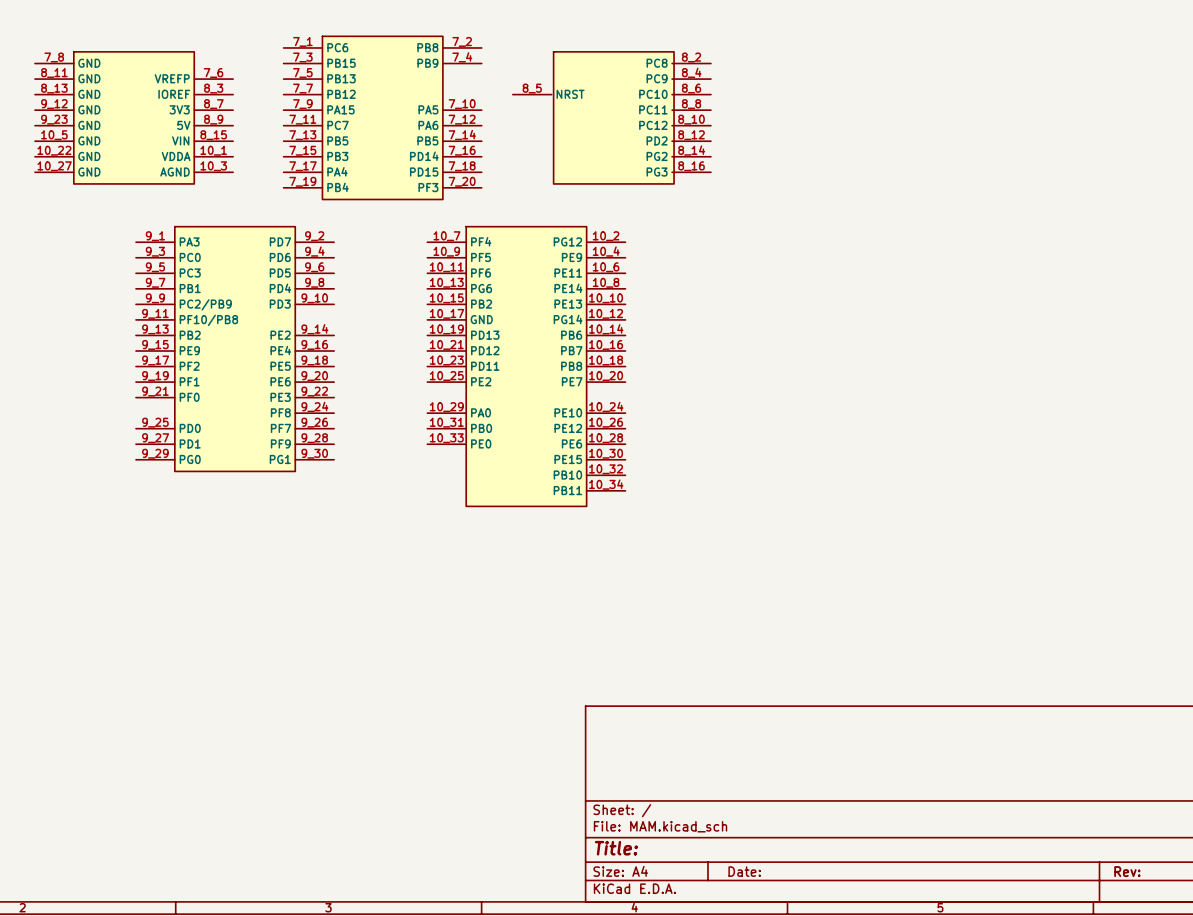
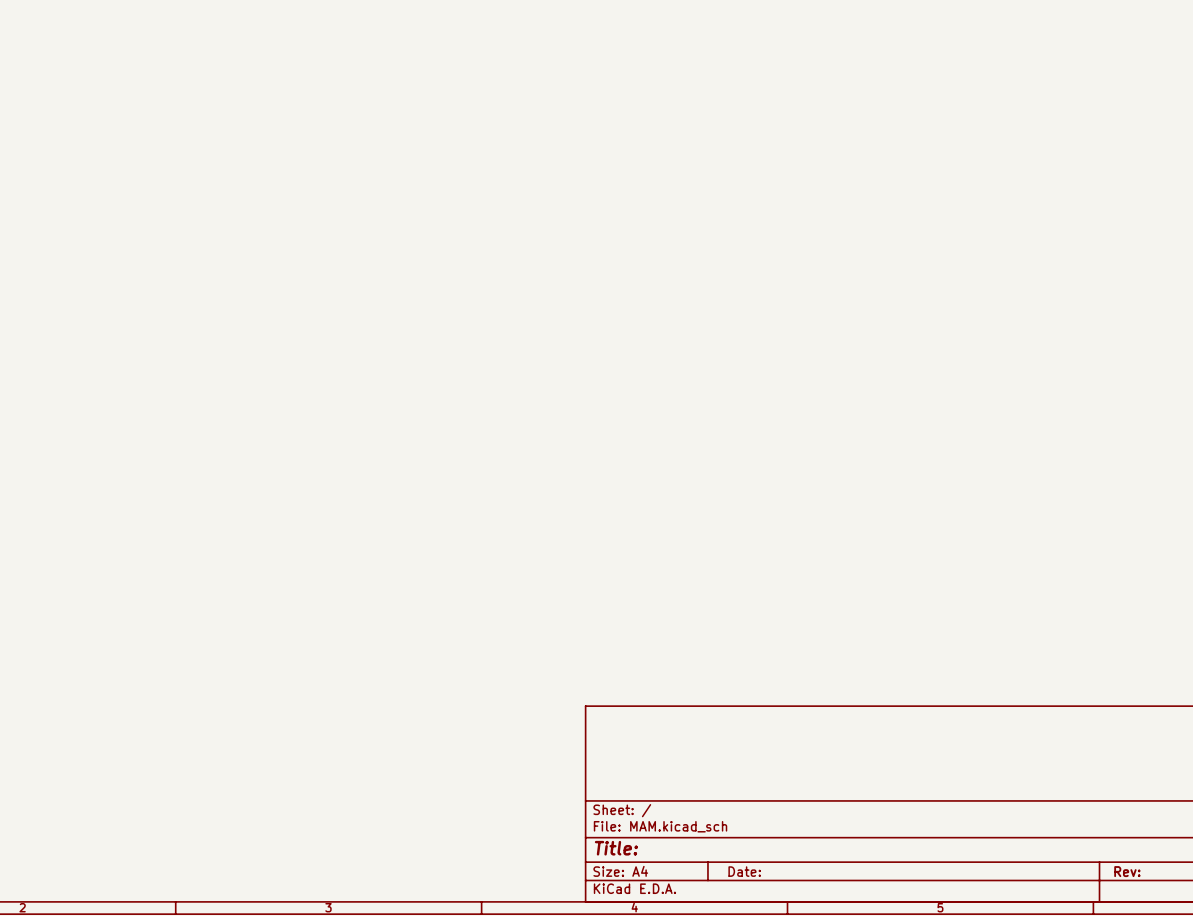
part: (134, 117) -> none
part: (382, 117) -> none
part: (611, 117) -> none
part: (235, 349) -> none
part: (526, 366) -> none

